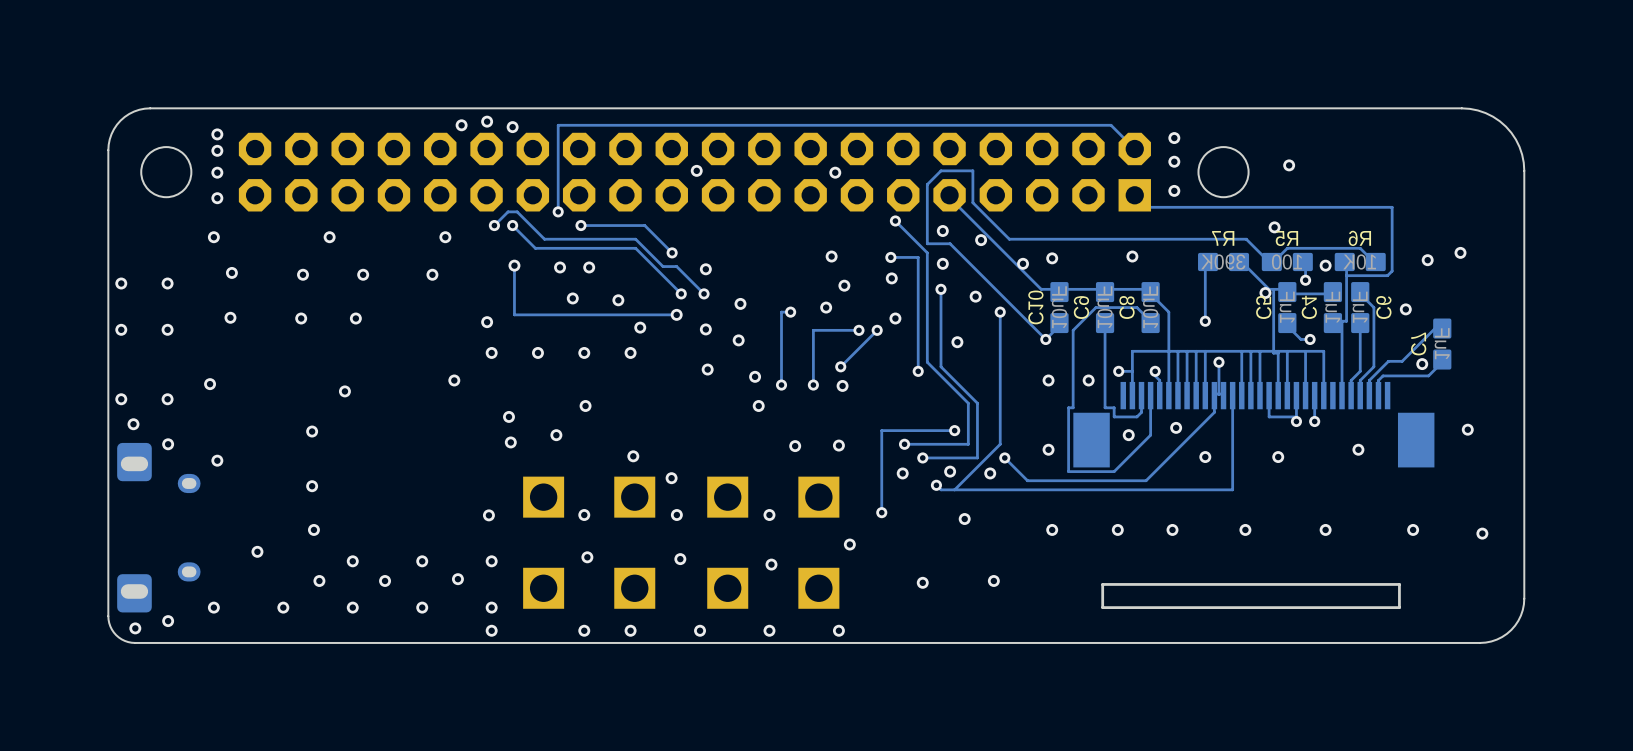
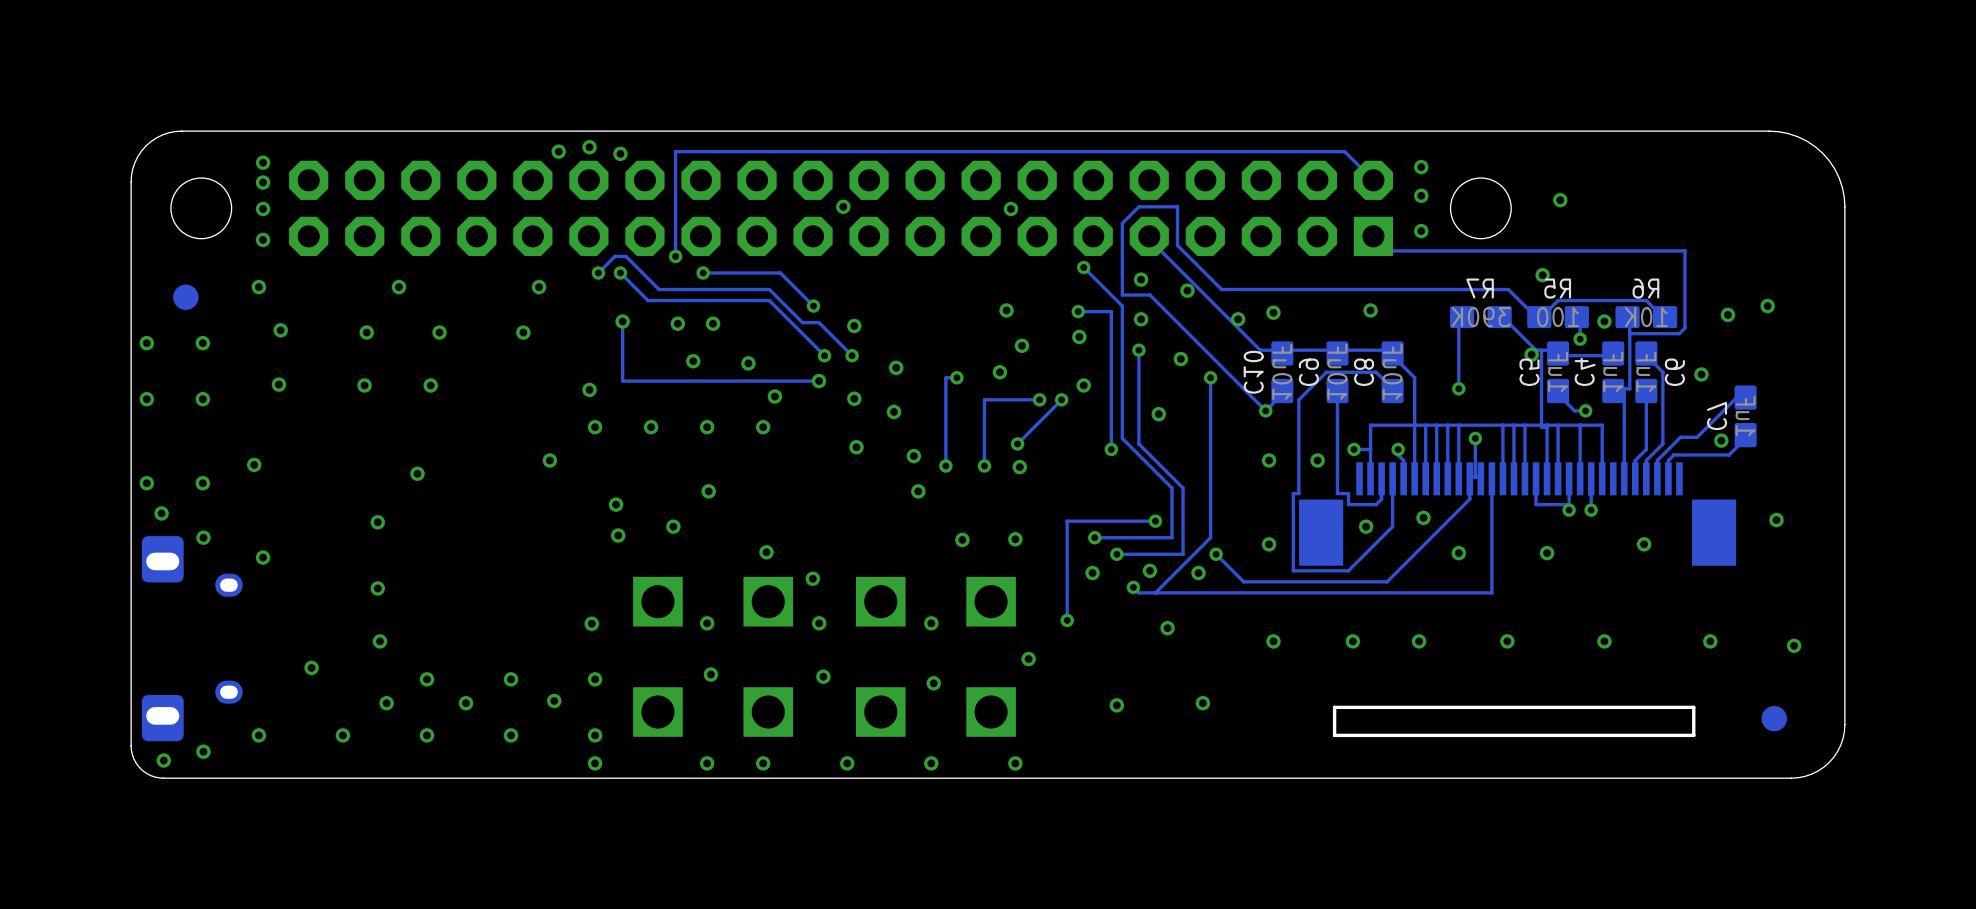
drawing: none -> [173, 284, 199, 310]
drawing: none -> [1761, 705, 1787, 732]

